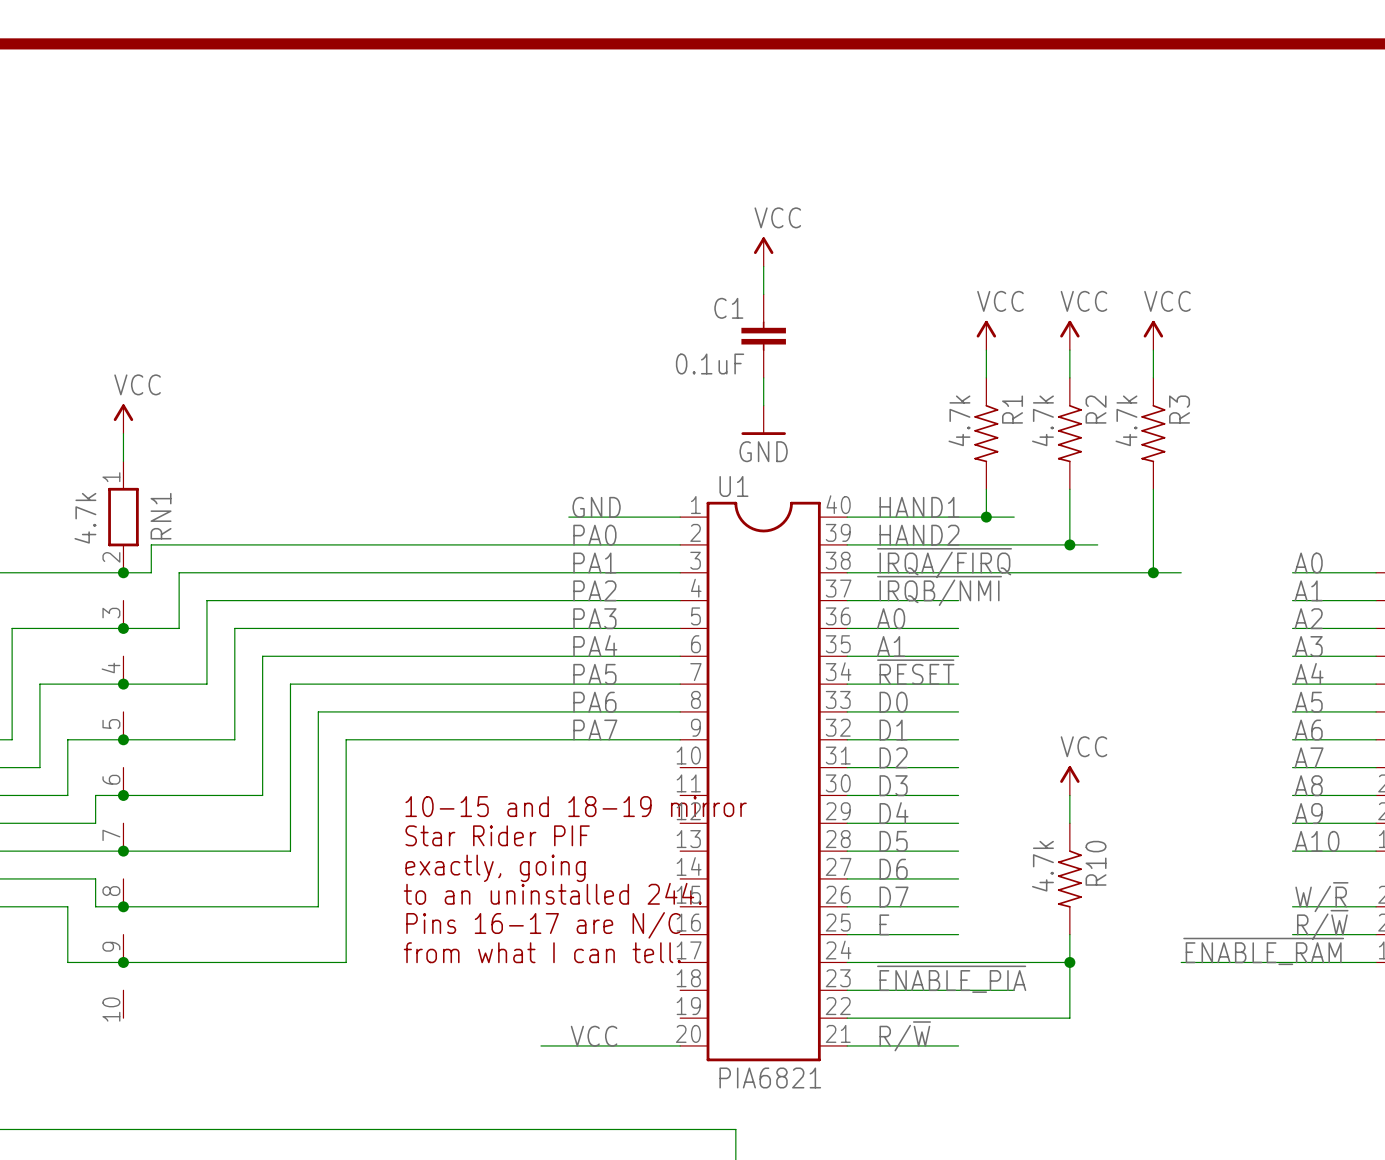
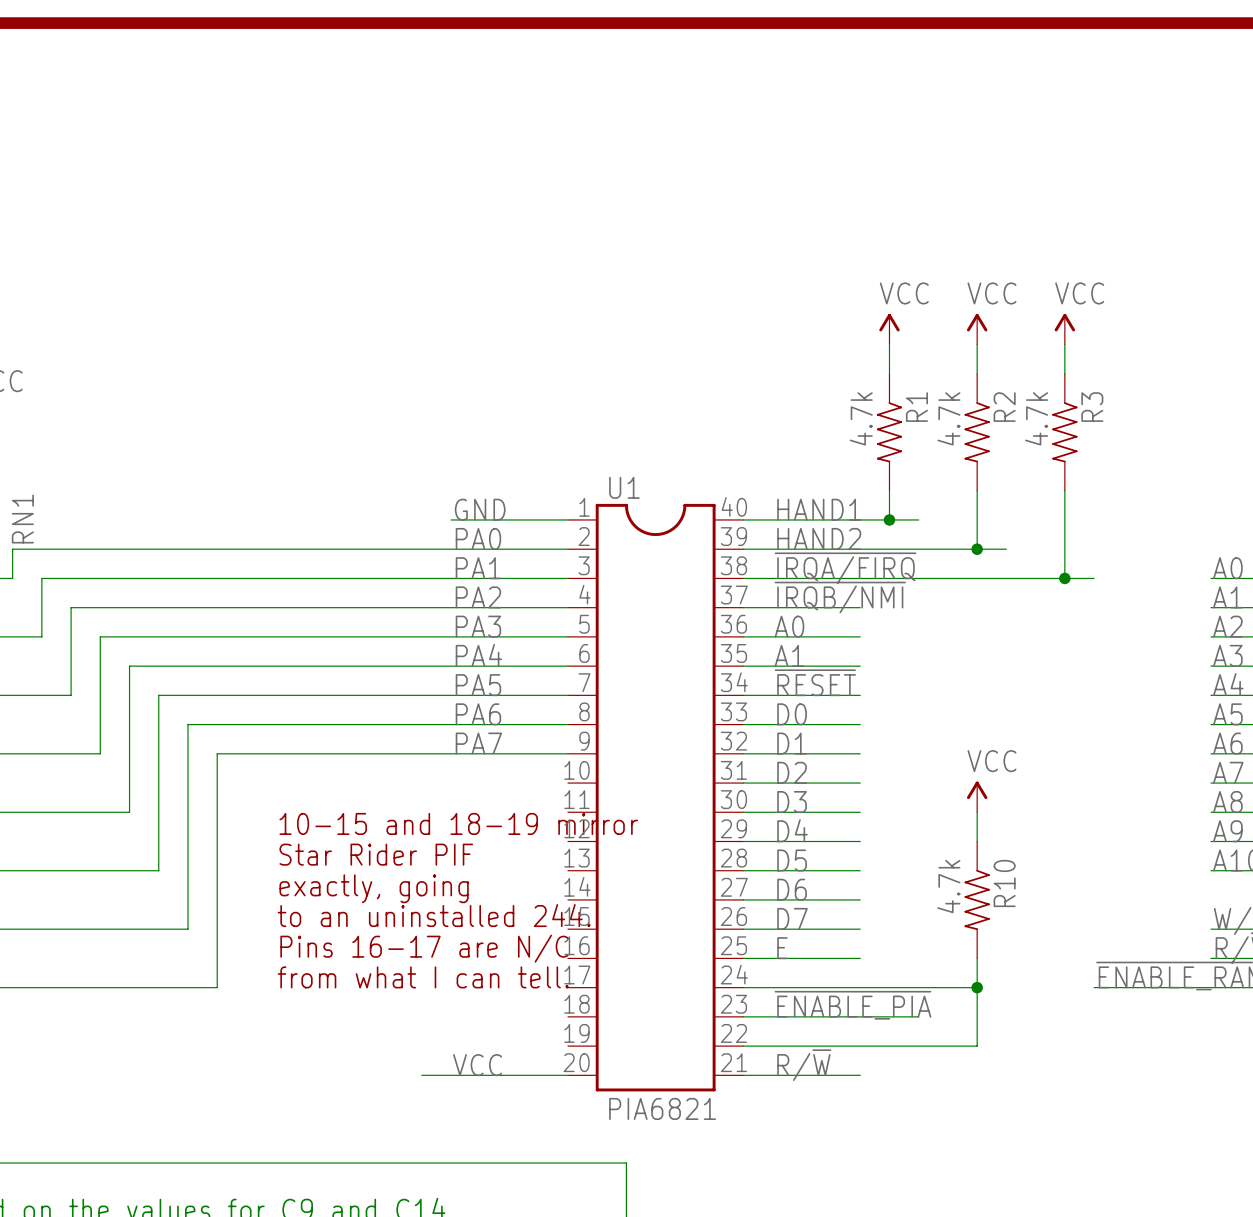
power symbol: VCC (763, 251) -> none
wire: (763, 266) (763, 294) -> none
C1: 0.1uF (763, 336) -> none
wire: (763, 377) (763, 405) -> none
power symbol: GND (763, 420) -> none

